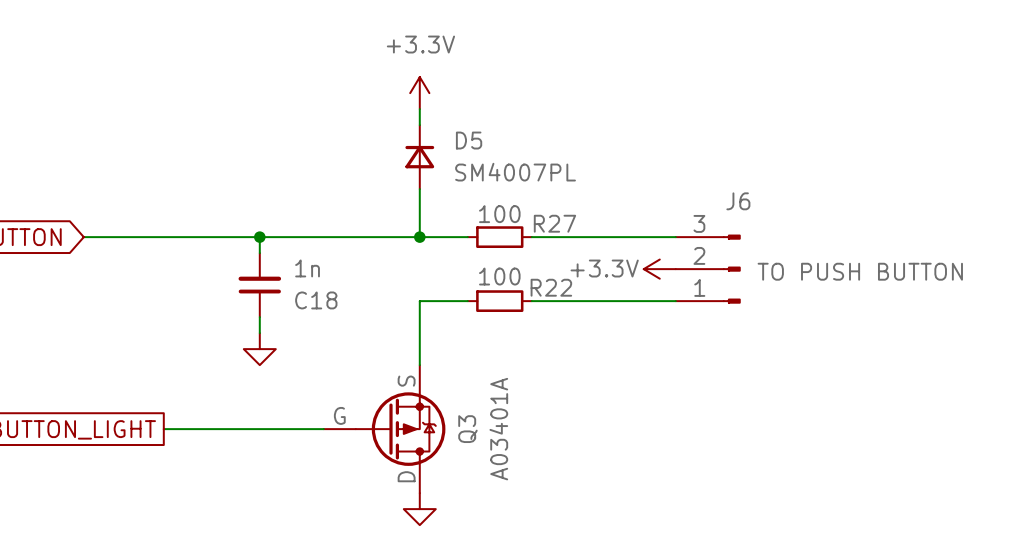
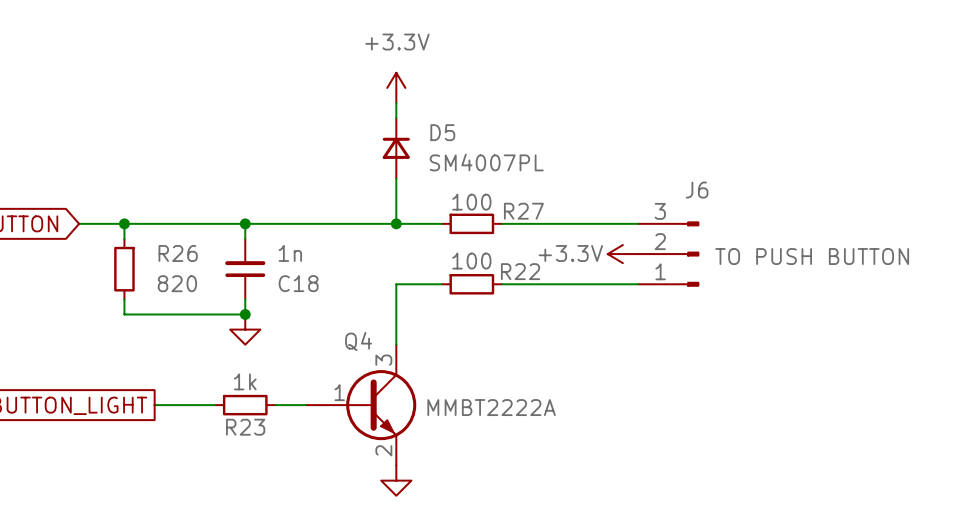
wire: none -> (124, 223) (124, 238)
junction: none -> (124, 223)
R26: none -> 820 (124, 269)
wire: none -> (124, 299) (124, 314) (245, 314)
junction: none -> (245, 314)
wire: (227, 429) (291, 429) -> none
R23: none -> 1k (245, 405)
Q4: none -> MMBT2222A (360, 405)
Q3: A03401A (384, 429) -> none

